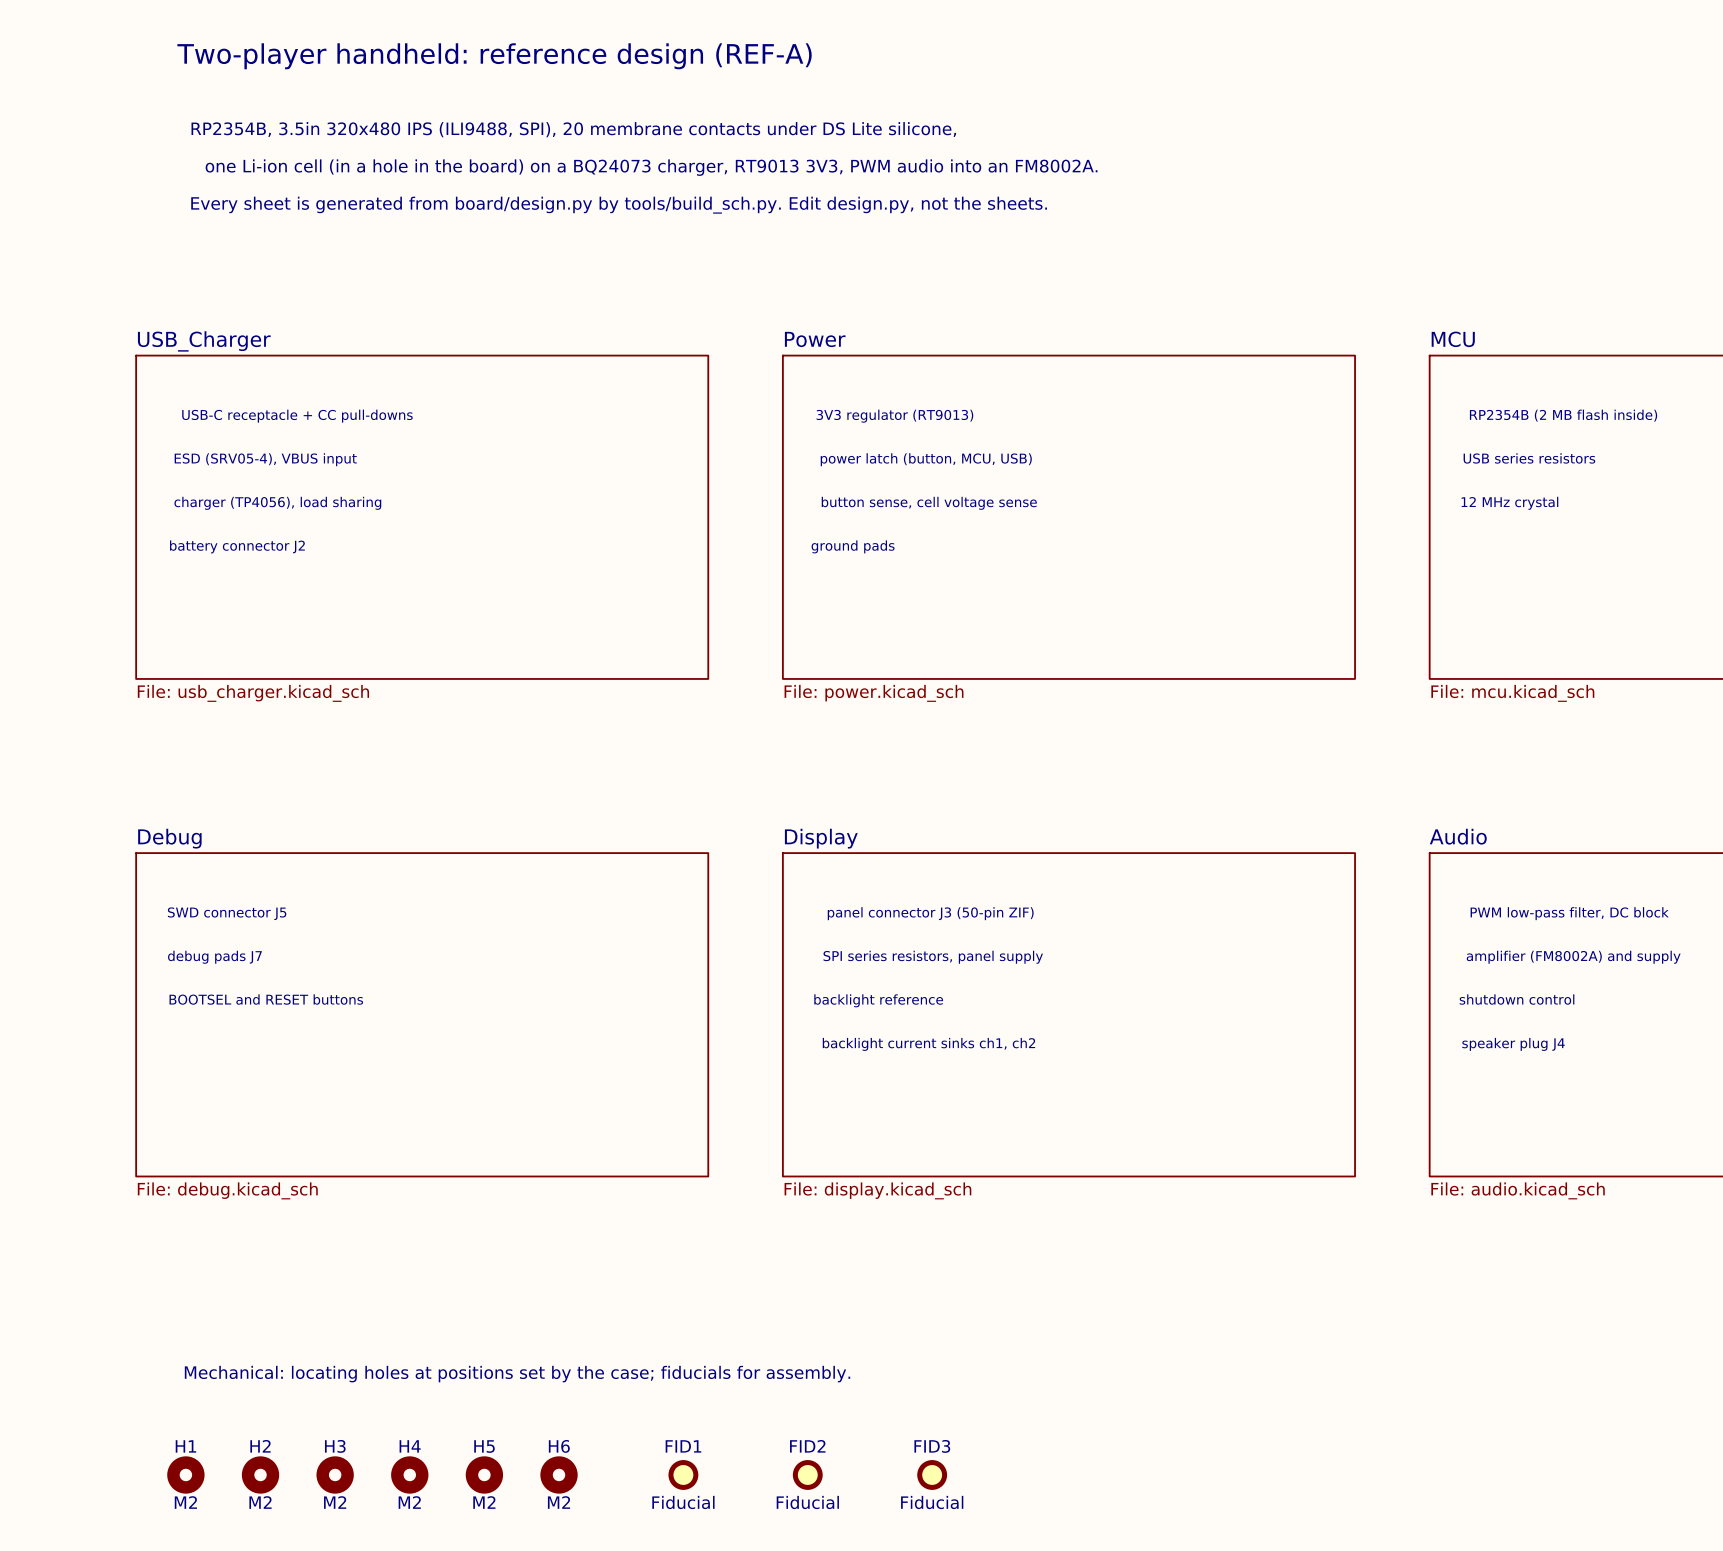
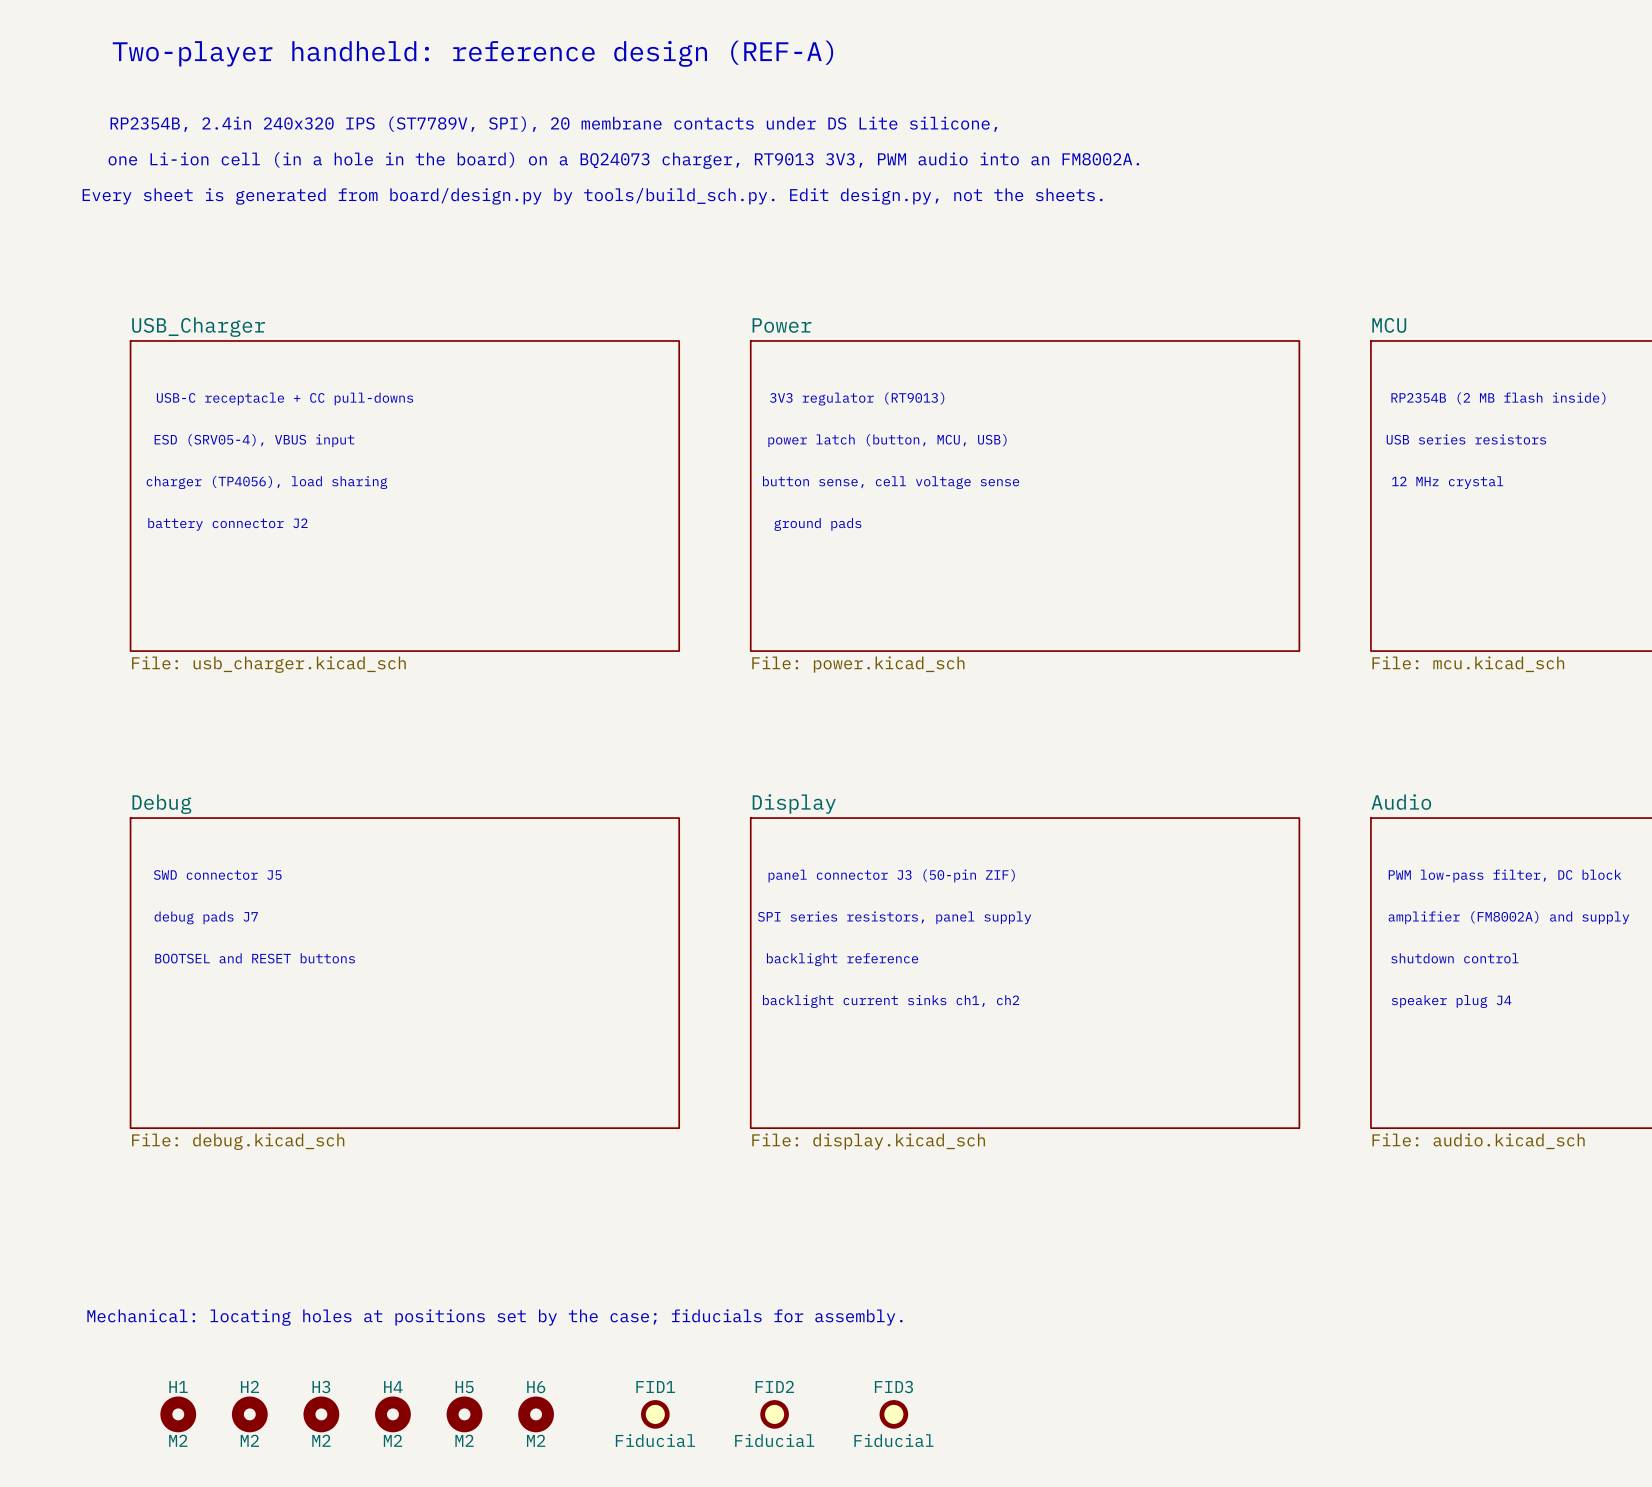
text: RP2354B, 3.5in 320x480 IPS (ILI9488, SPI), 20 membrane contacts under DS Lite silicone, (573, 129) -> RP2354B, 2.4in 240x320 IPS (ST7789V, SPI), 20 membrane contacts under DS Lite silicone, (553, 124)

